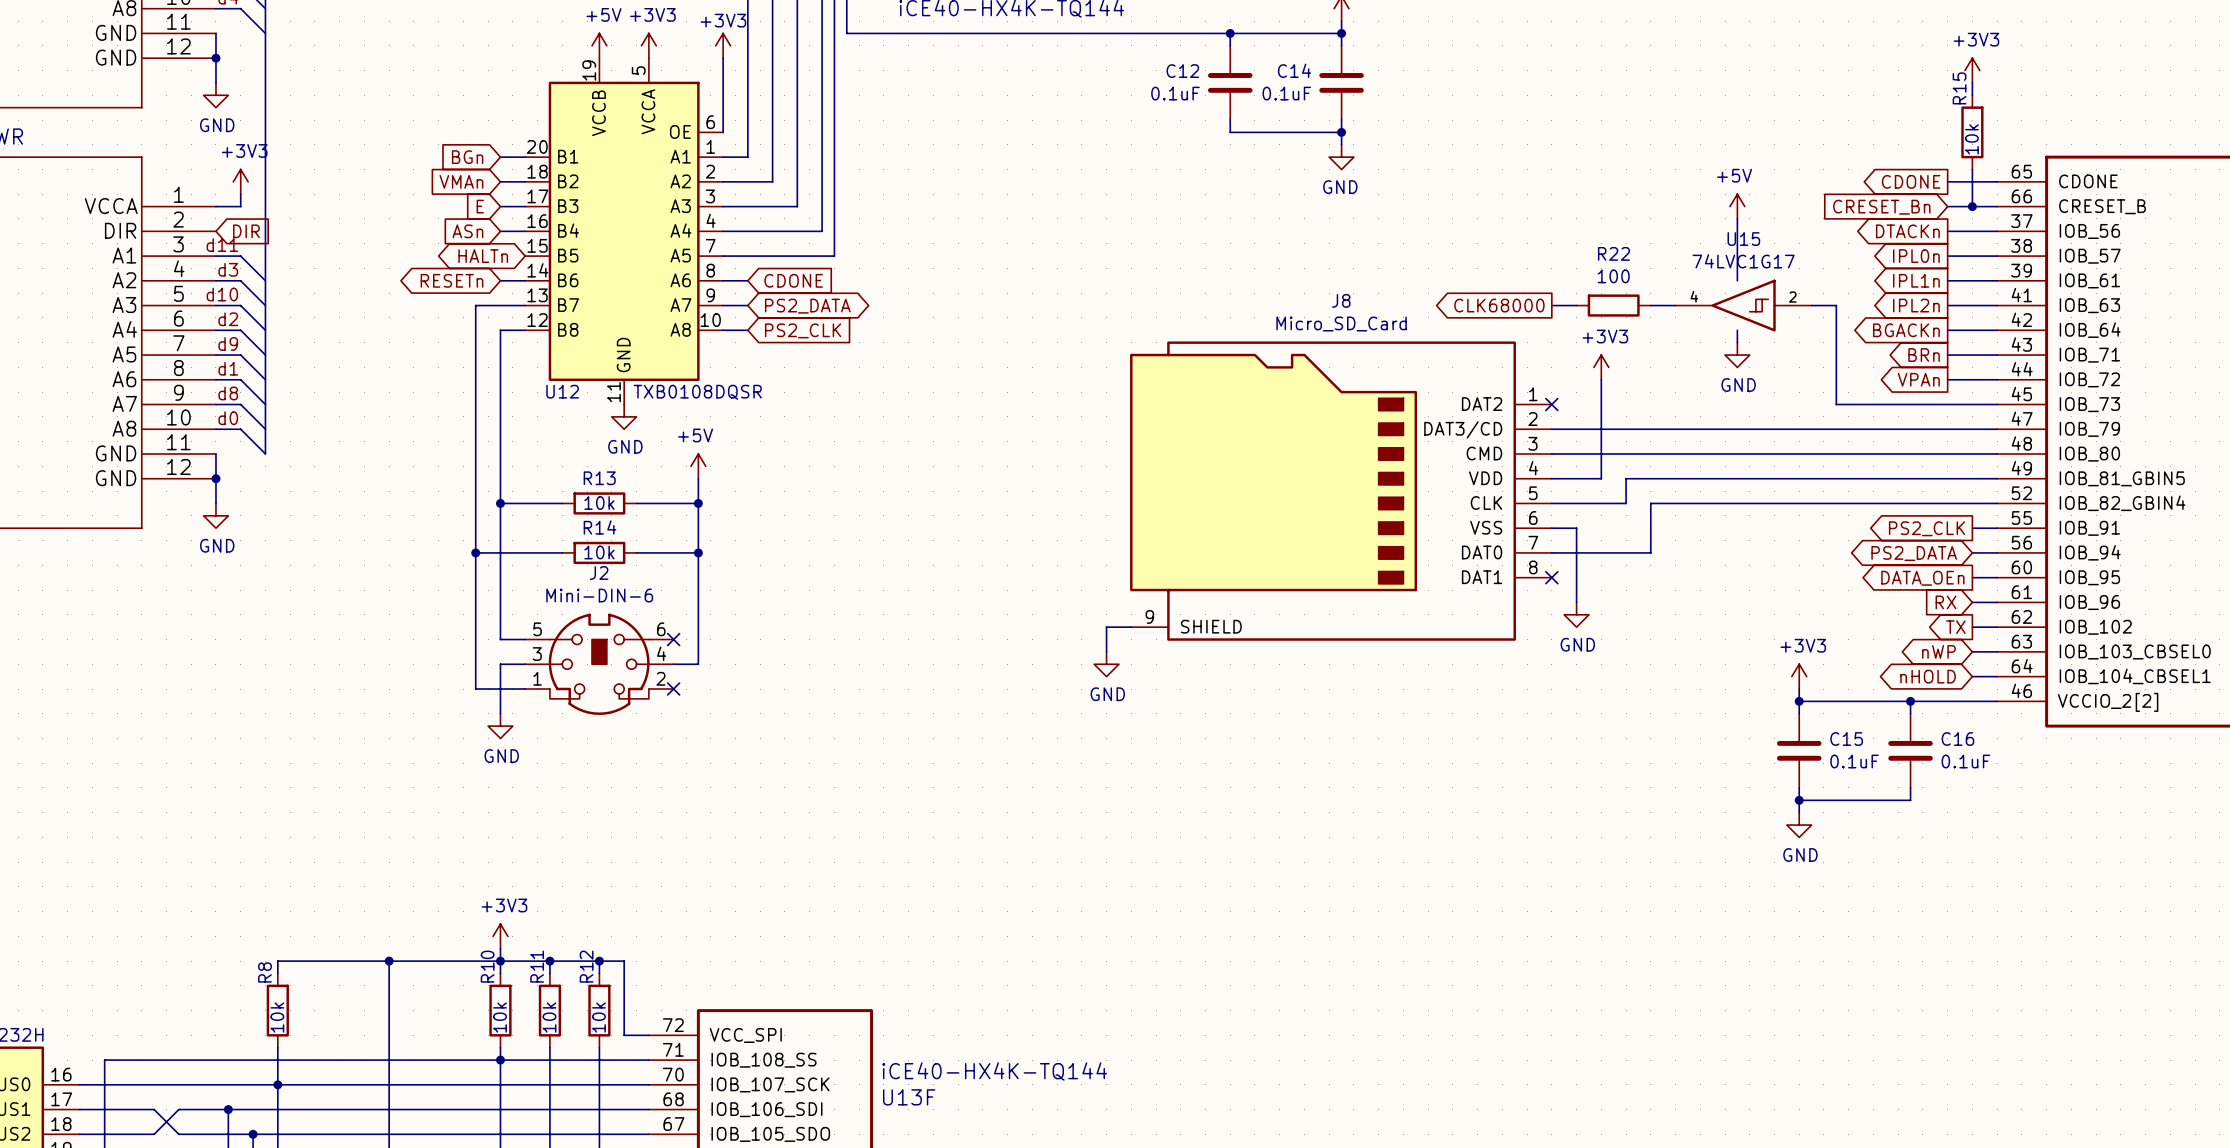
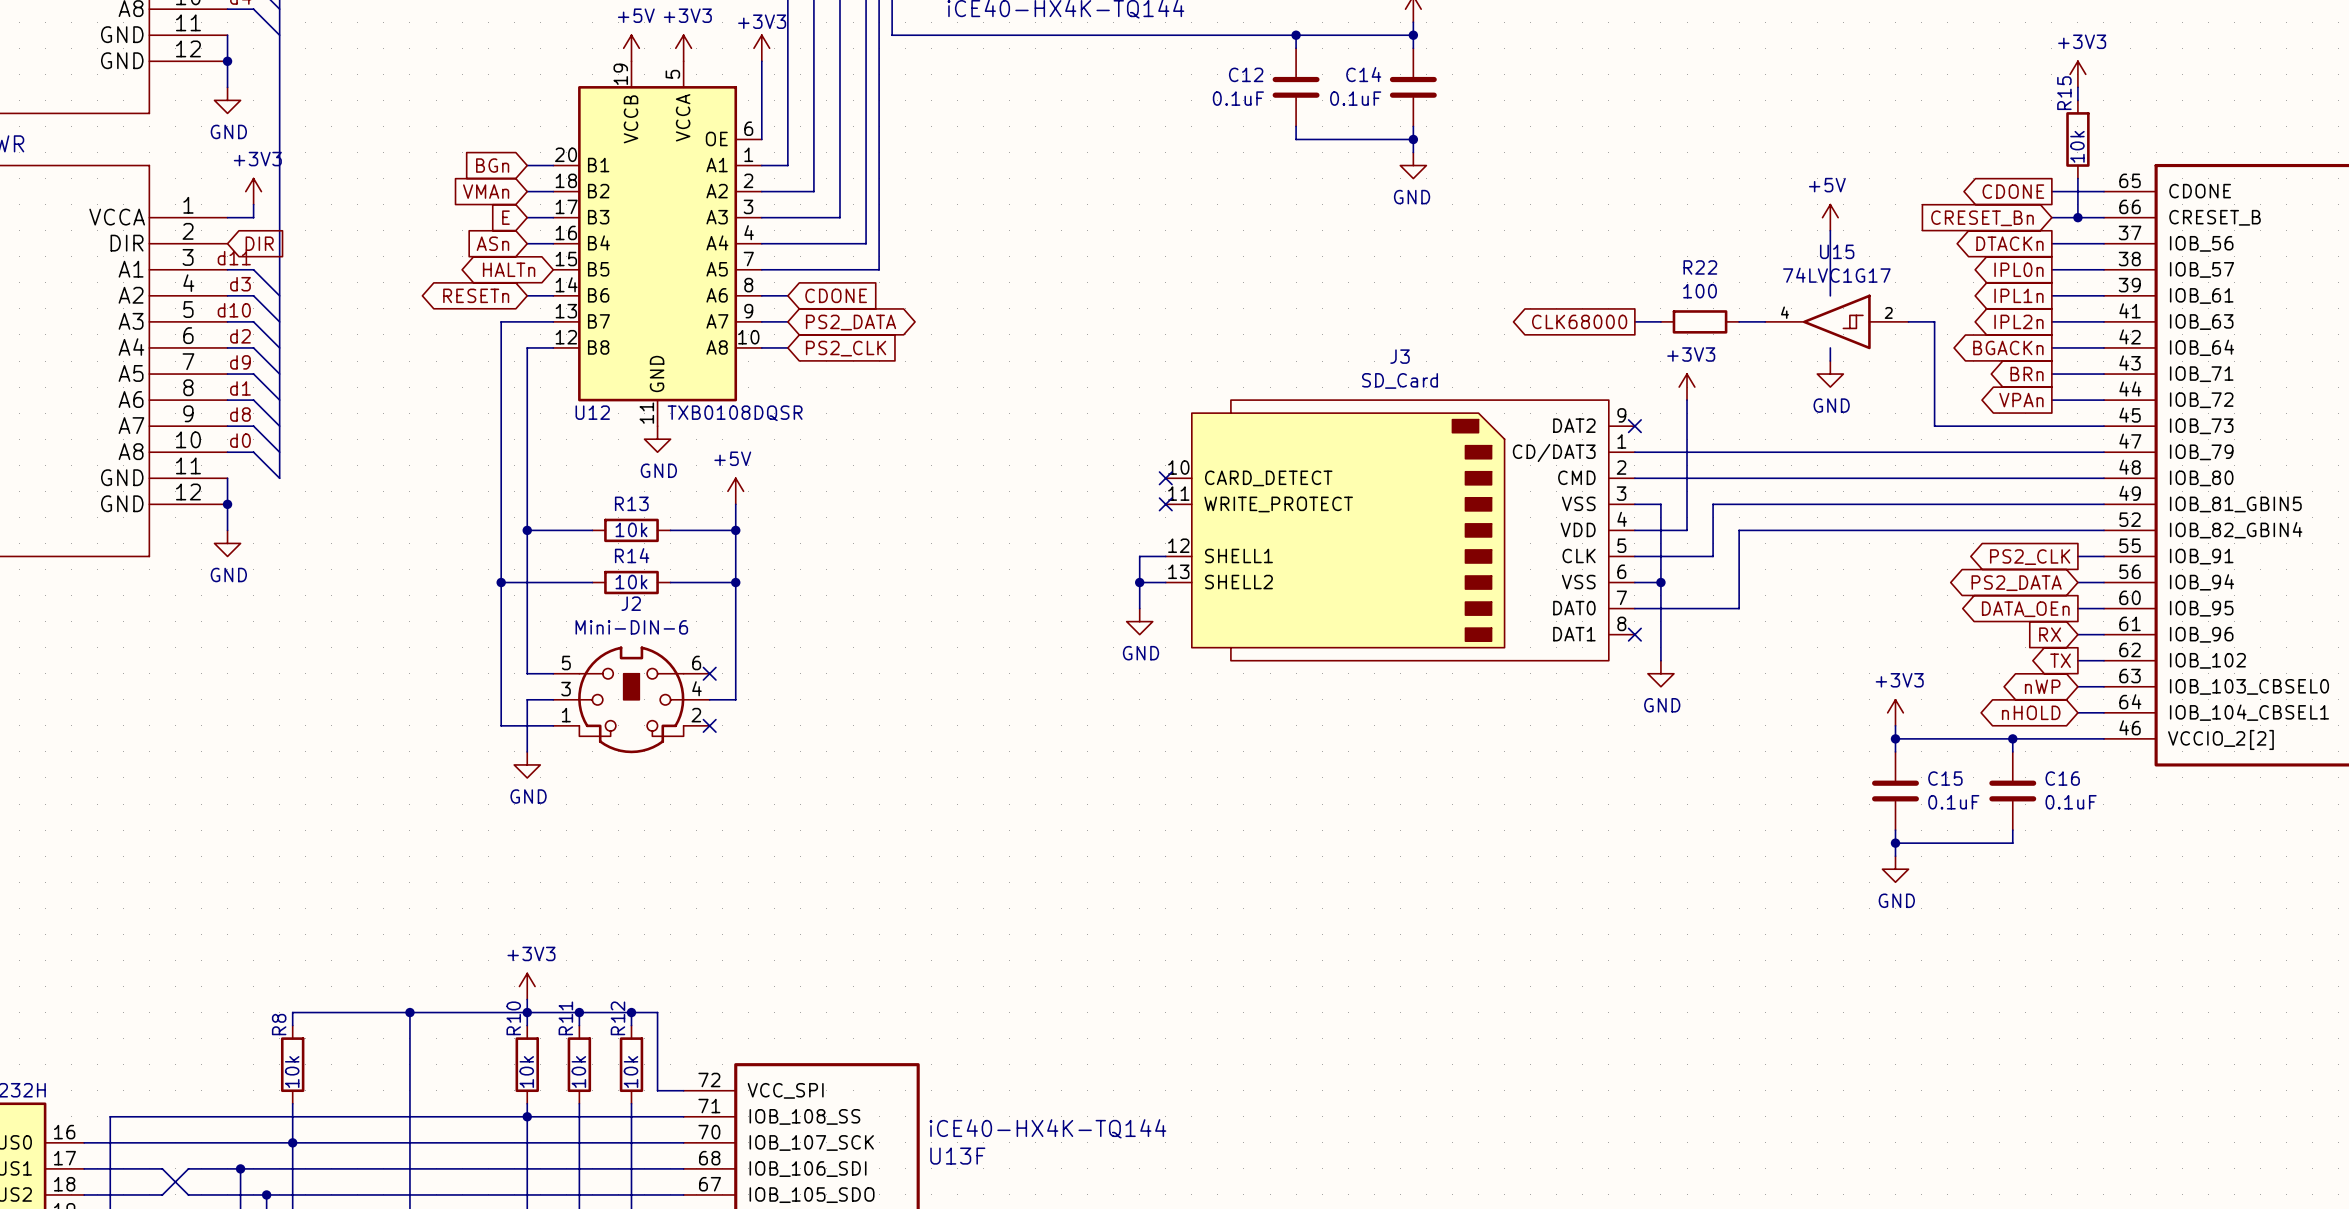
no-connect mark: none -> (1165, 478)
no-connect mark: none -> (1165, 504)
wire: (1576, 478) (1601, 478) -> (1660, 504) (1660, 556) (1713, 556) (1713, 530)
J8: Micro_SD_Card (1340, 491) -> none
J3: none -> SD_Card (1400, 530)
wire: (1601, 503) (1626, 503) -> (1687, 530) (1687, 504)
wire: none -> (1165, 556) (1139, 556) (1139, 608)
wire: none -> (1139, 582) (1165, 582)
junction: none -> (1139, 582)
wire: (1576, 552) (1650, 552) -> (1634, 608) (1739, 608) (1739, 582)
junction: none -> (1660, 582)
no-connect mark position: (1551, 577) -> (1634, 634)
power symbol position: GND (1576, 614) -> GND (1660, 673)
wire: (1131, 627) (1106, 627) (1106, 651) -> none
power symbol position: GND (1106, 664) -> GND (1139, 621)

